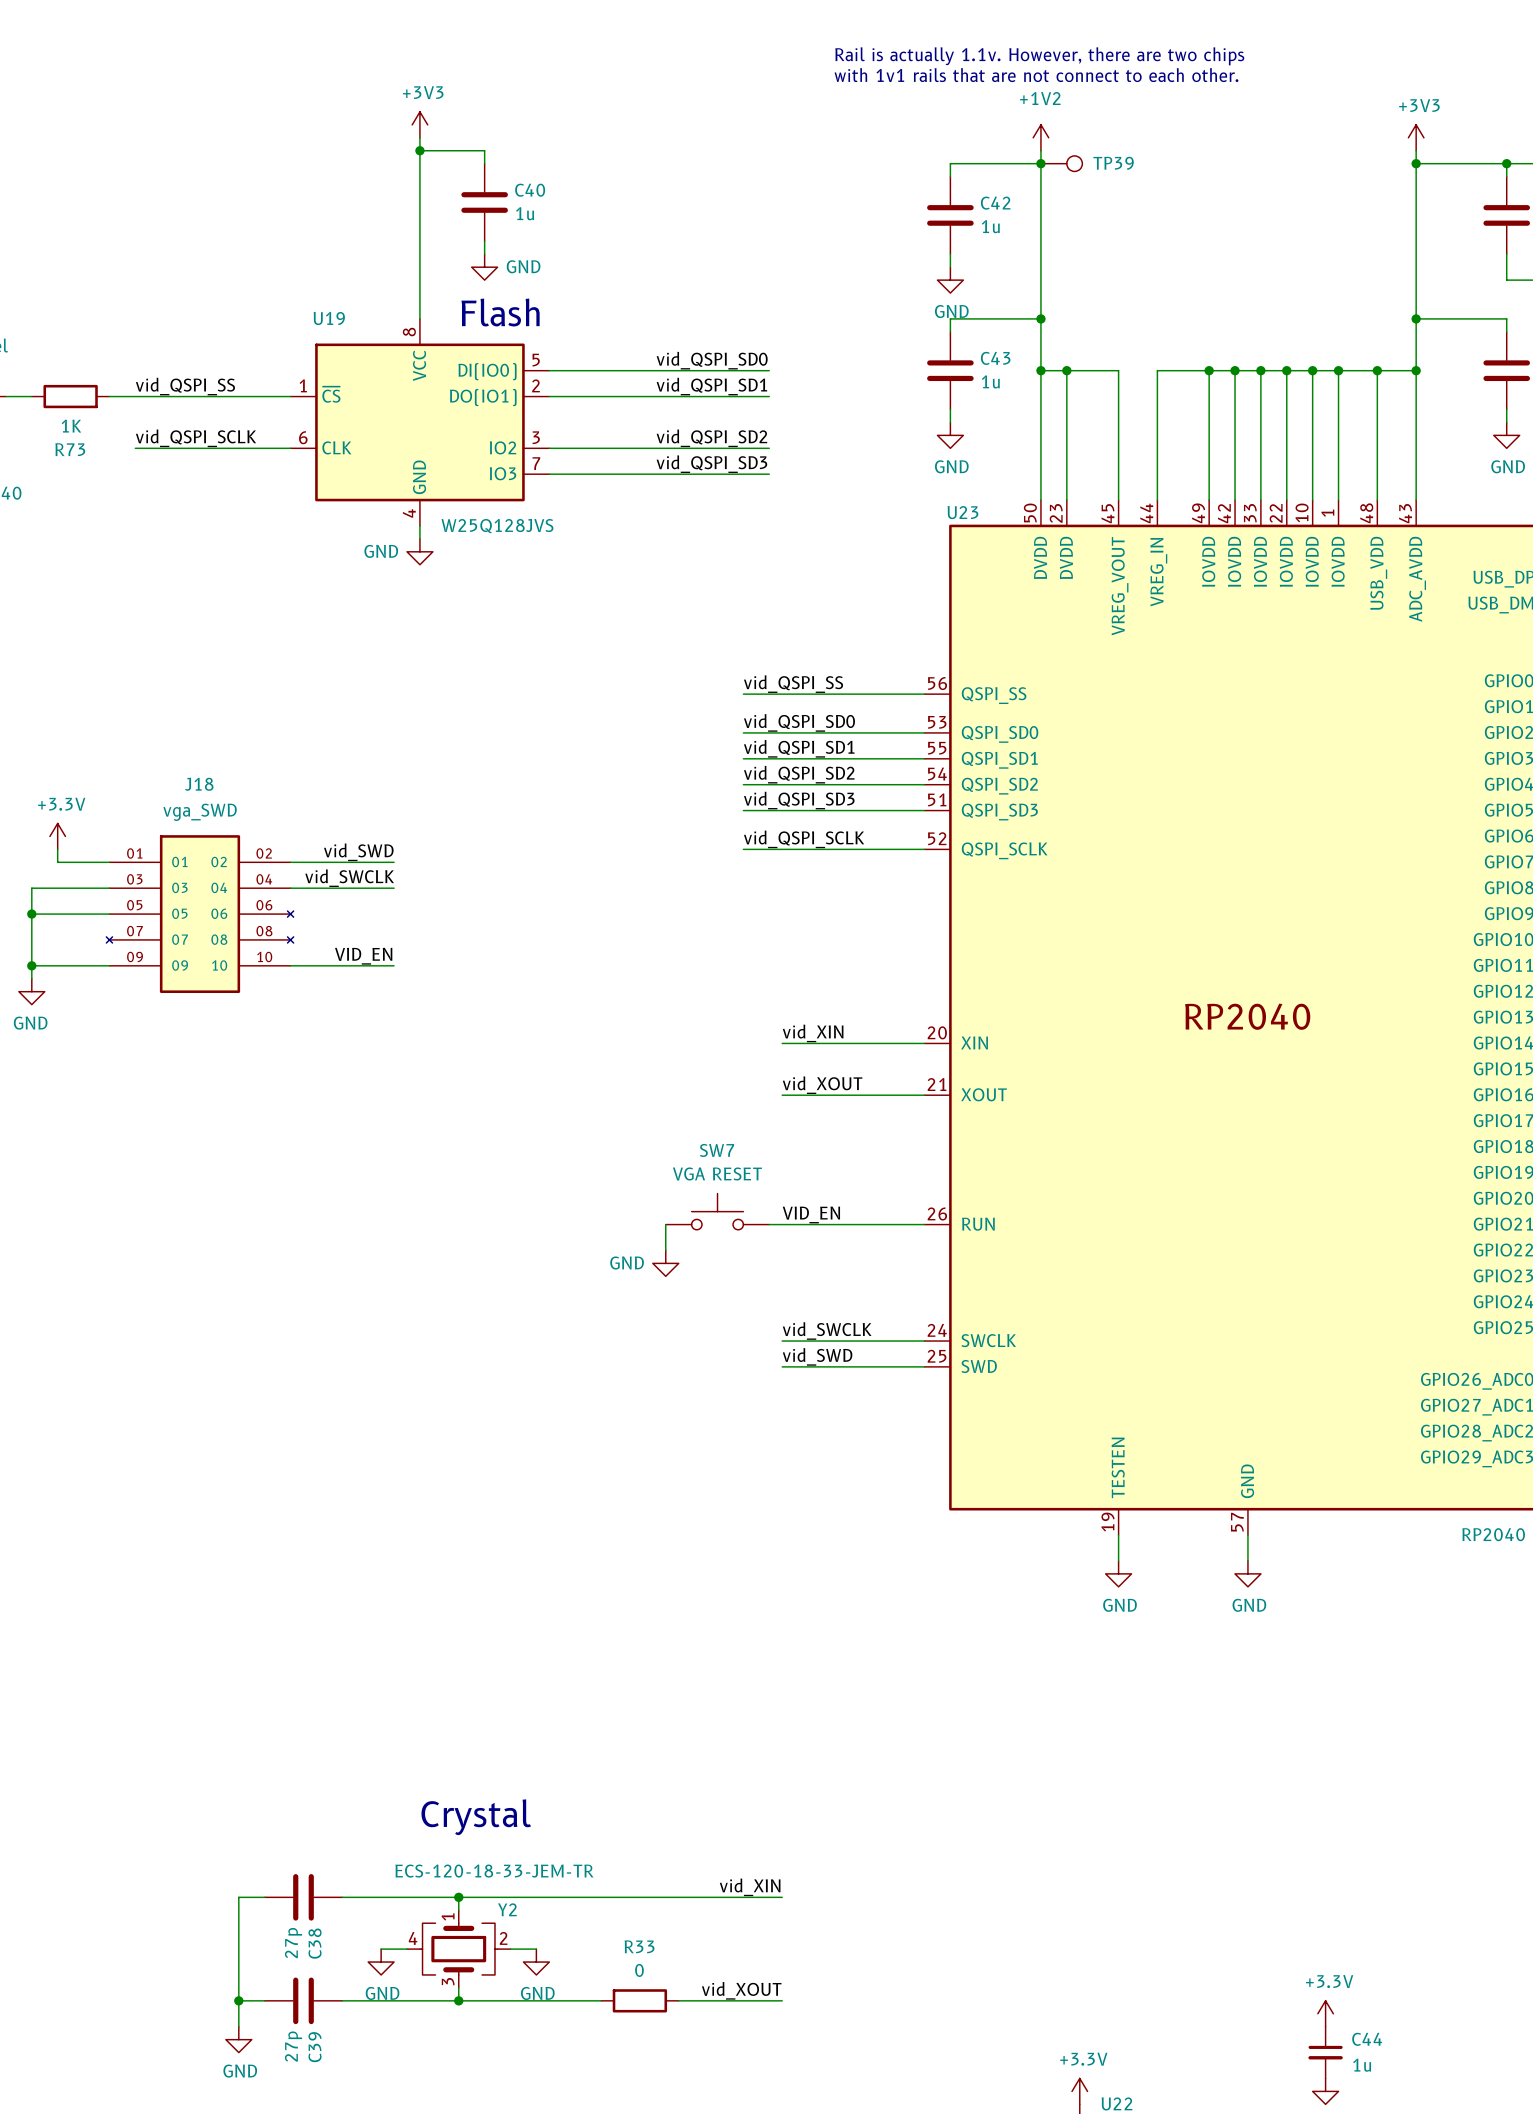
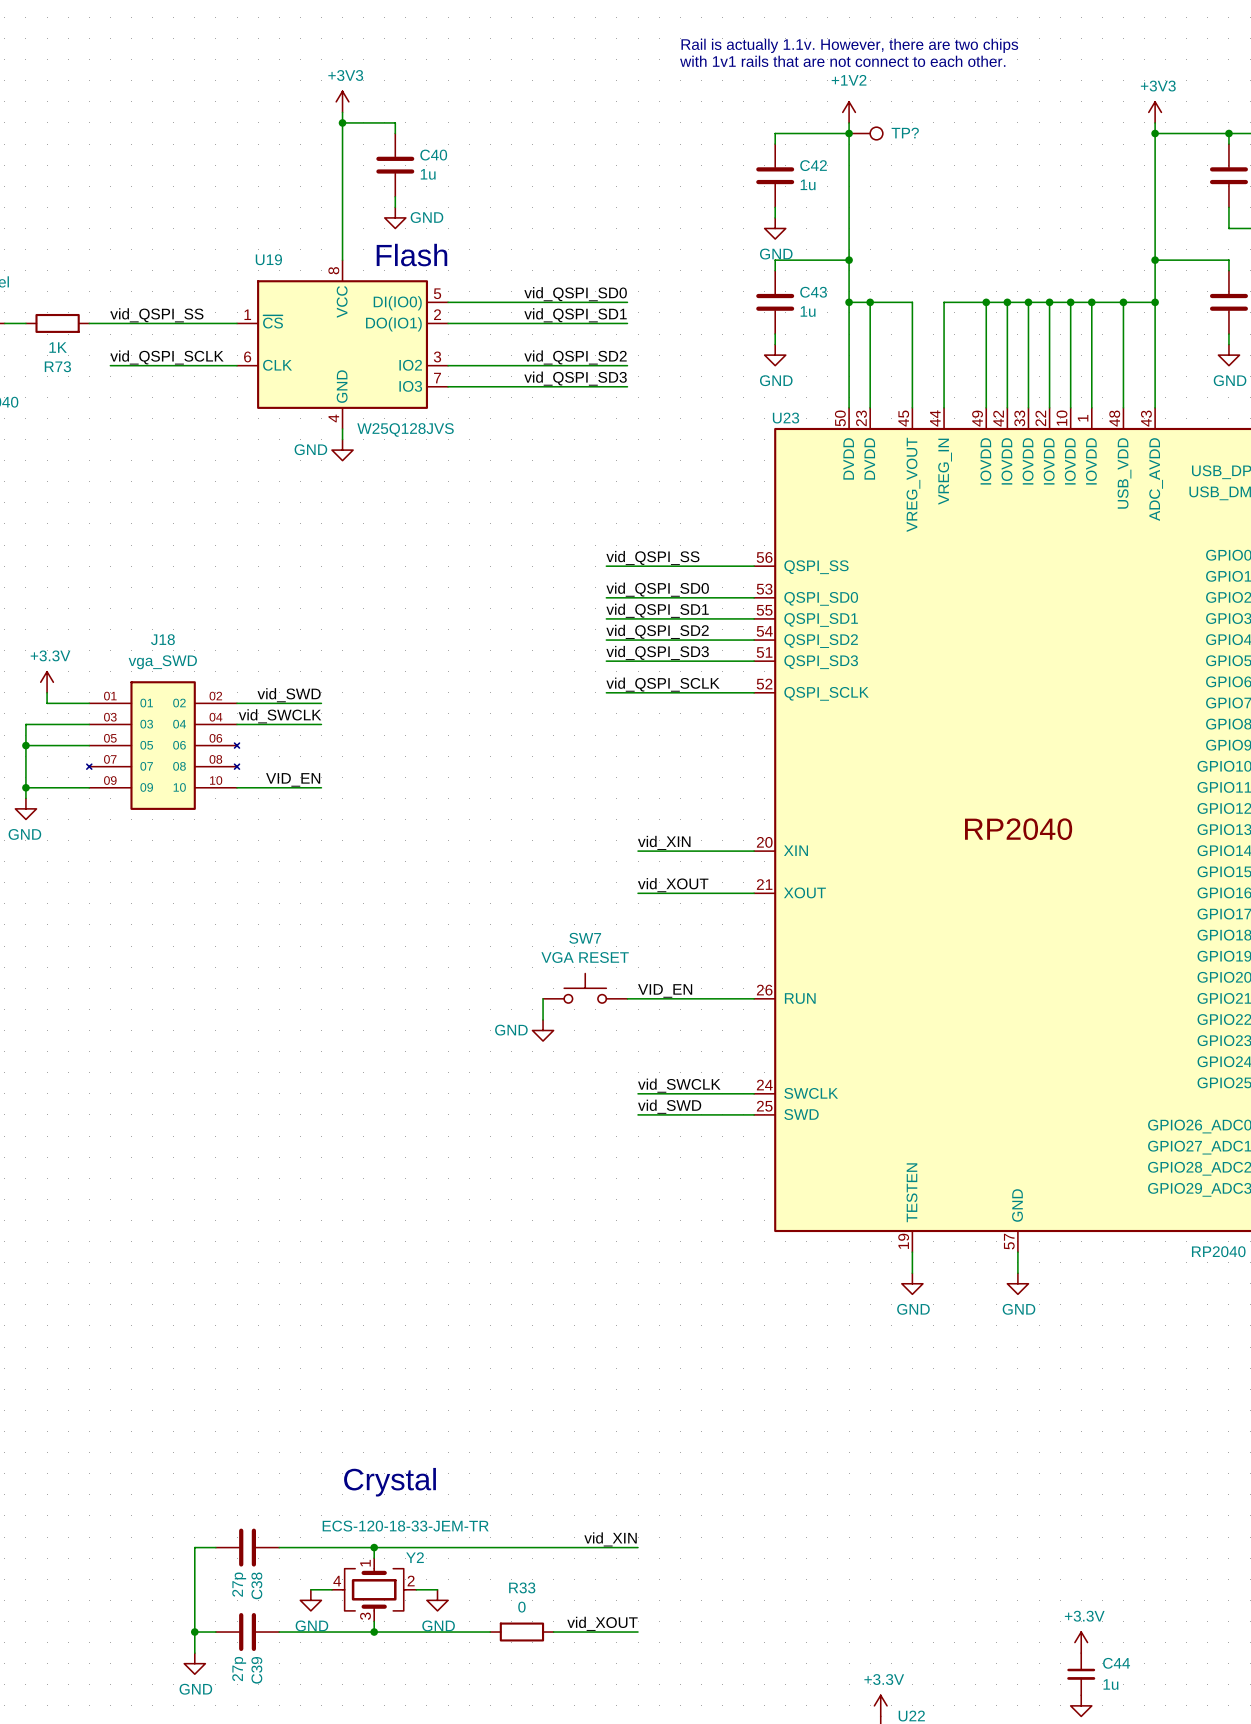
TP39 name: TP39 (1113, 163) -> TP? (905, 133)

